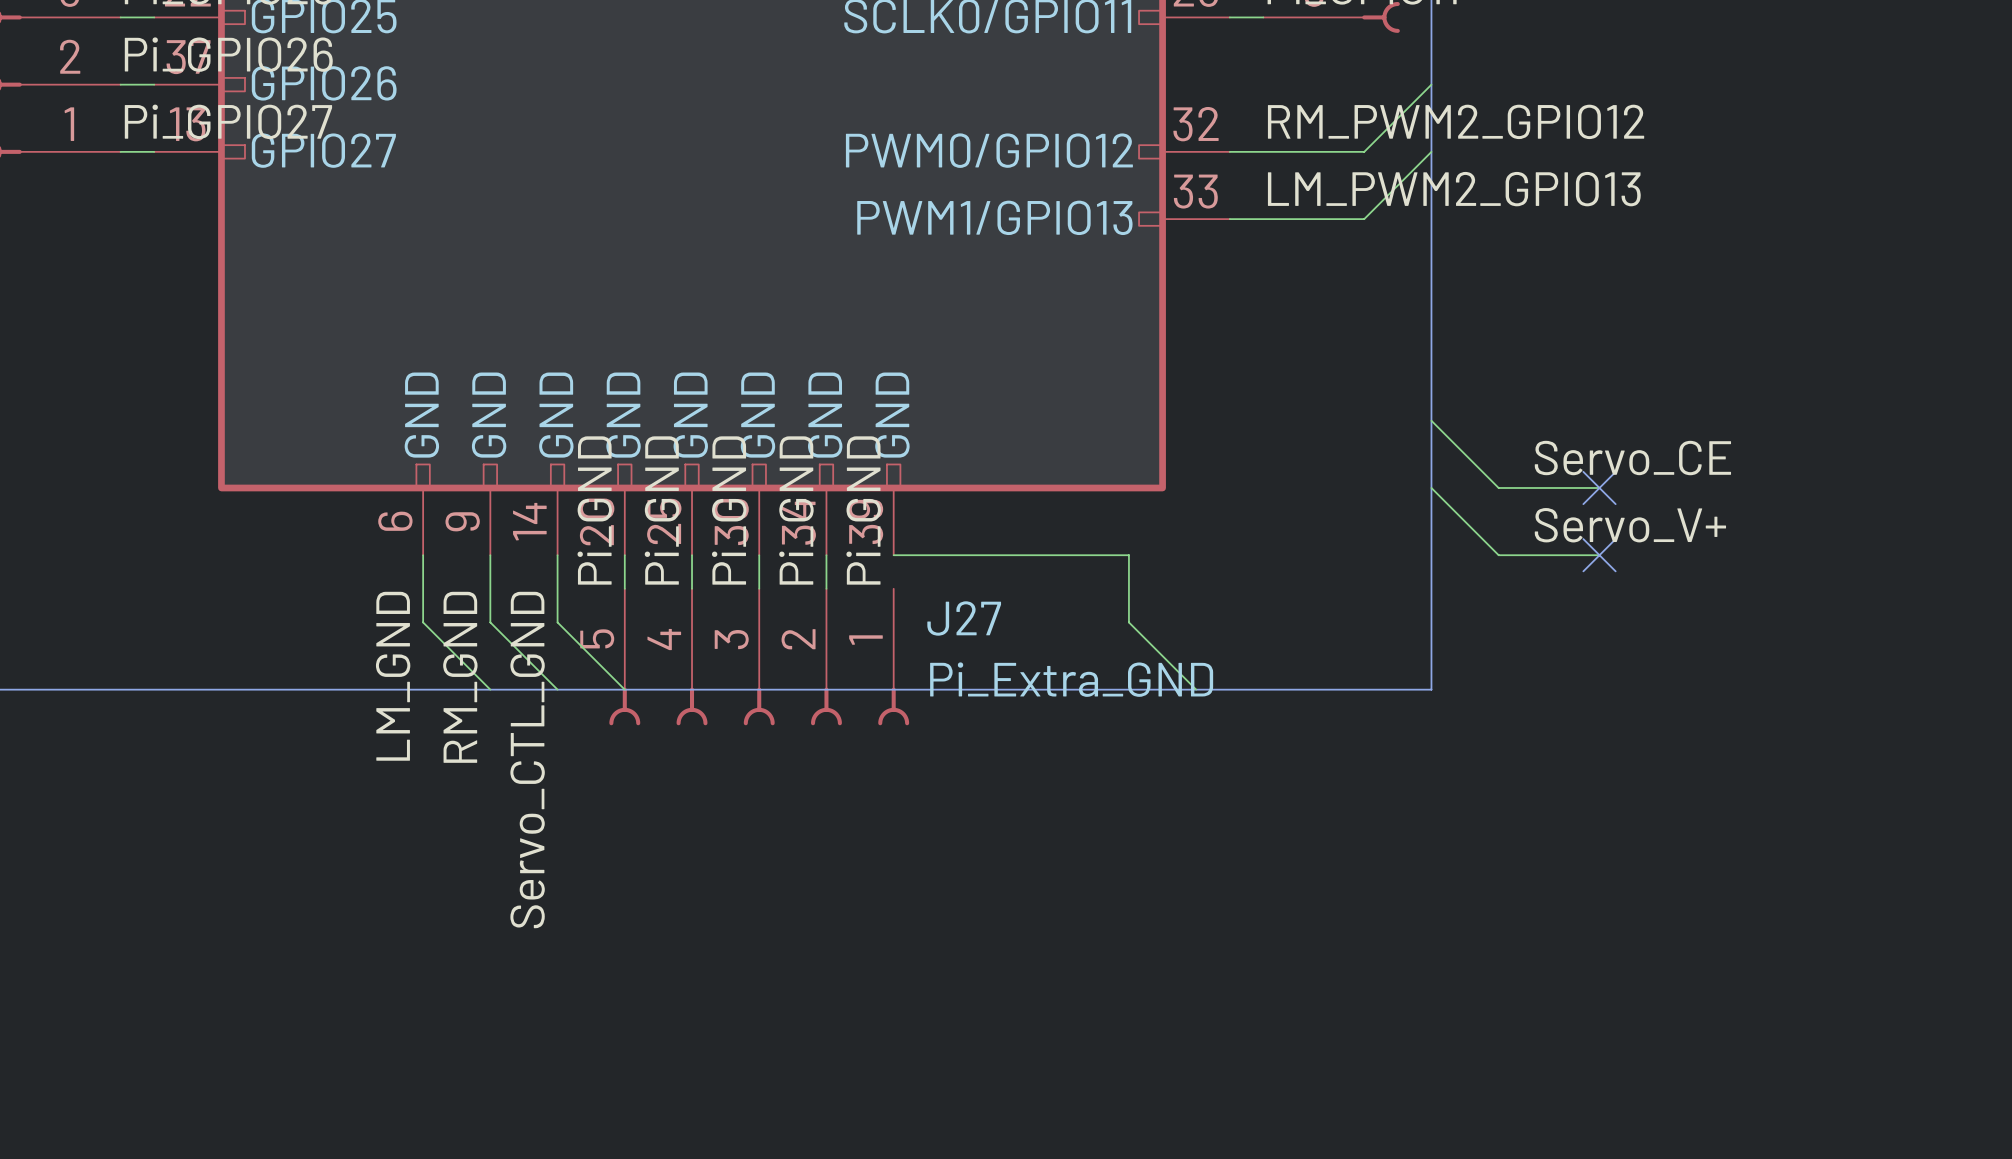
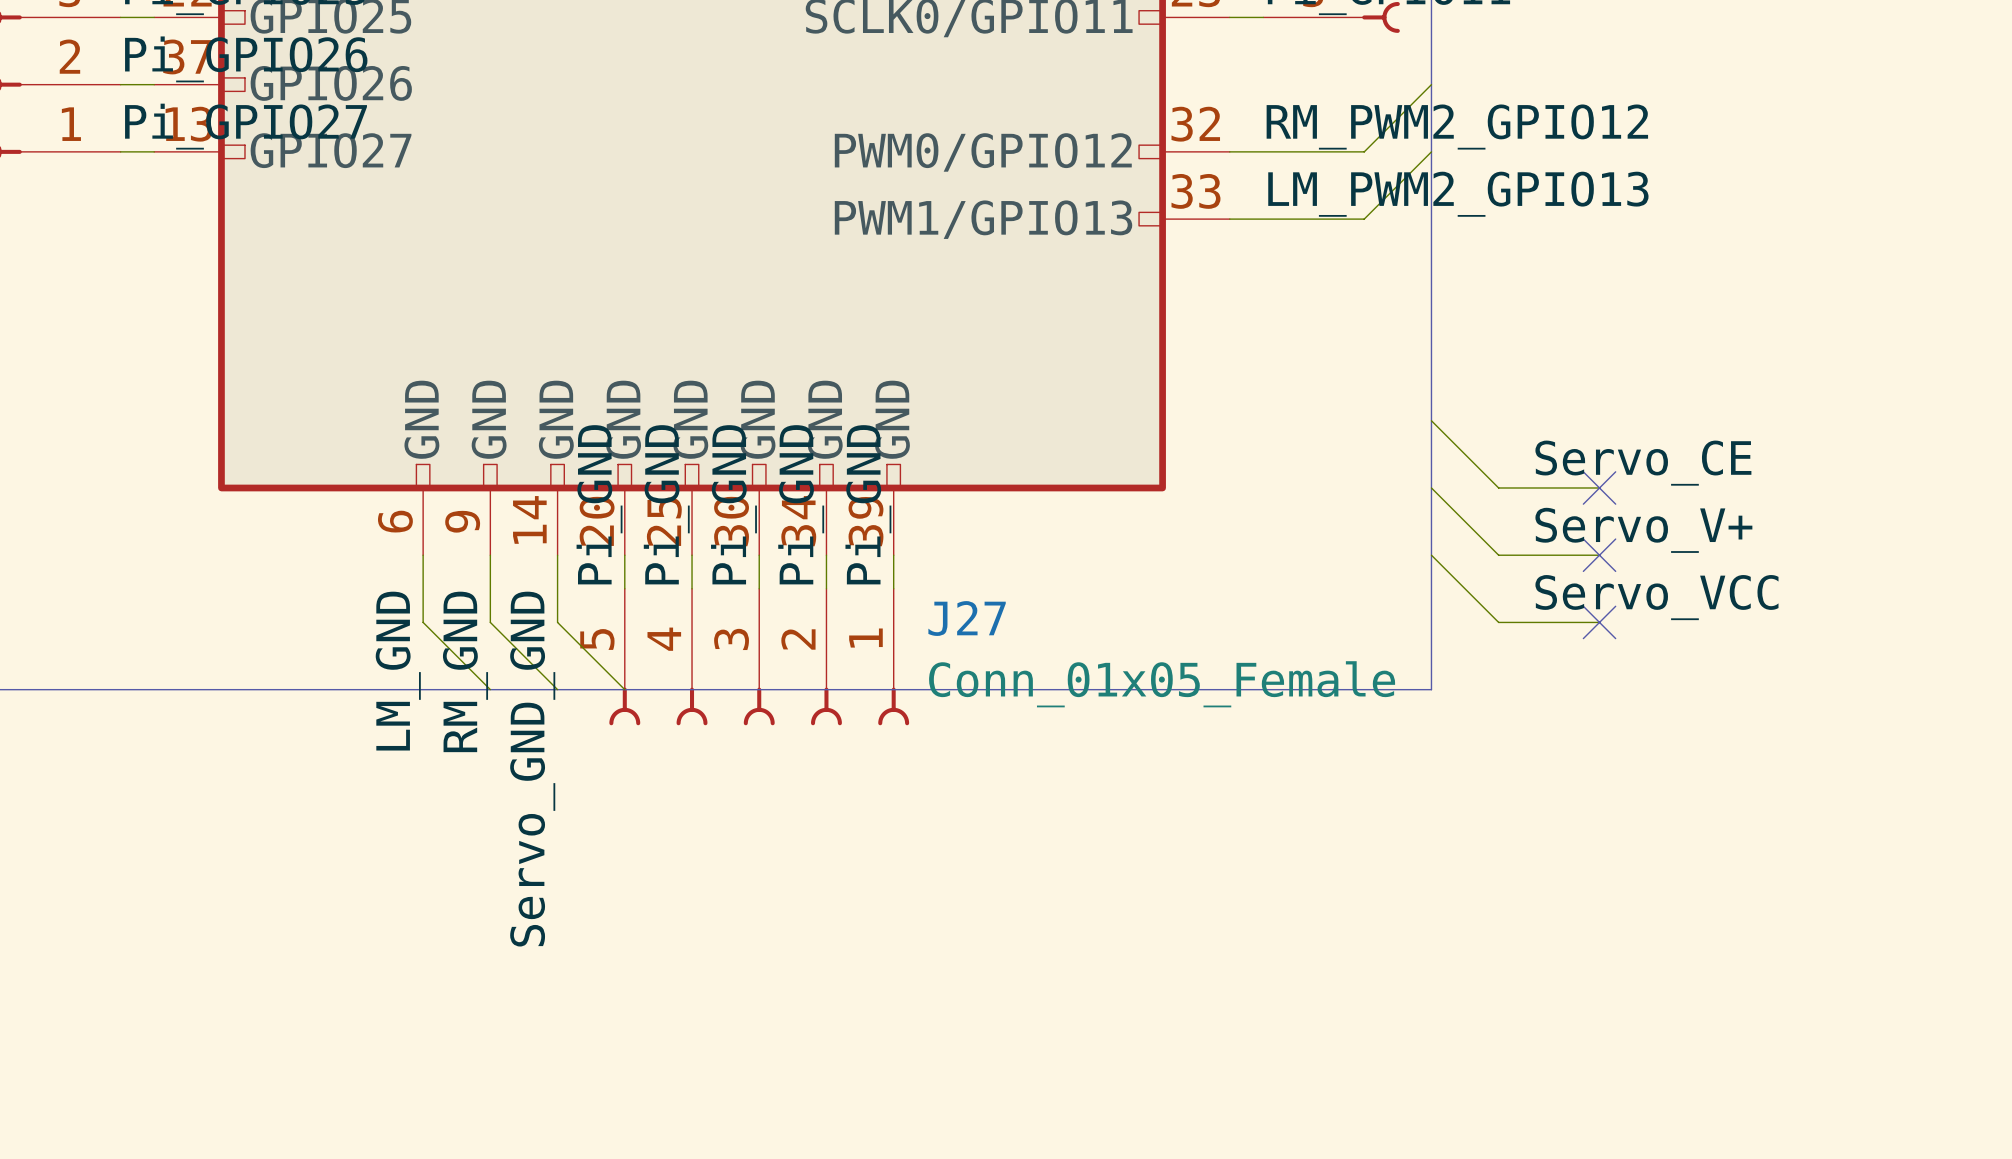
wire: (893, 555) (1128, 555) (1128, 622) (1196, 689) -> (893, 555) (893, 588)
wire: none -> (1431, 555) (1498, 622) (1599, 622)
label: none -> Servo_VCC (1656, 597)
no-connect mark: none -> (1599, 622)
J27 value: Pi_Extra_GND (1071, 679) -> Conn_01x05_Female (1162, 684)
label: Servo_CTL_GND (527, 760) -> Servo_GND_GND (532, 769)

